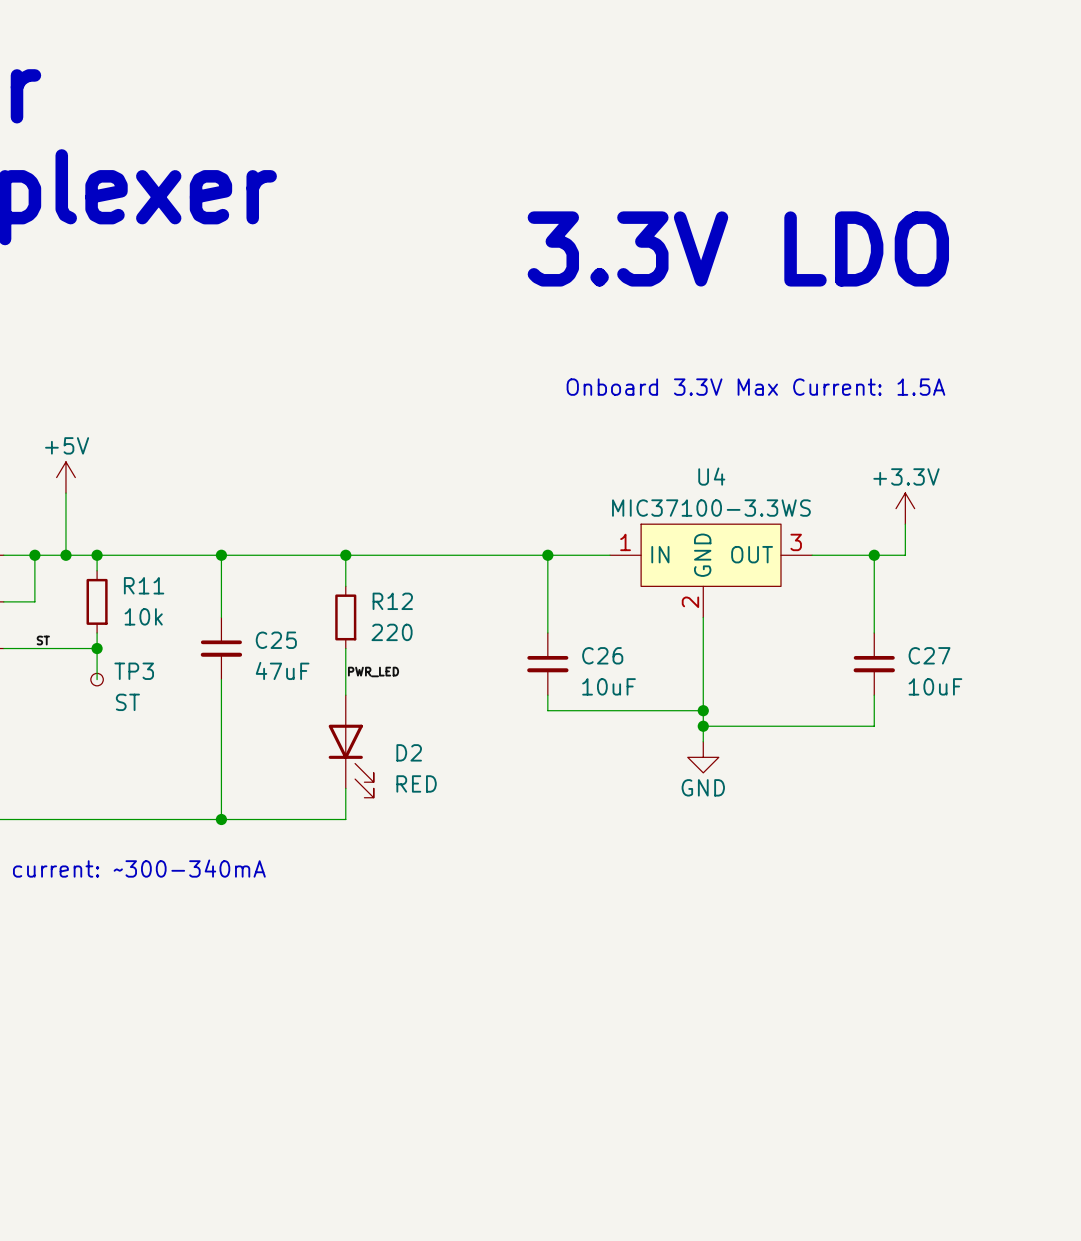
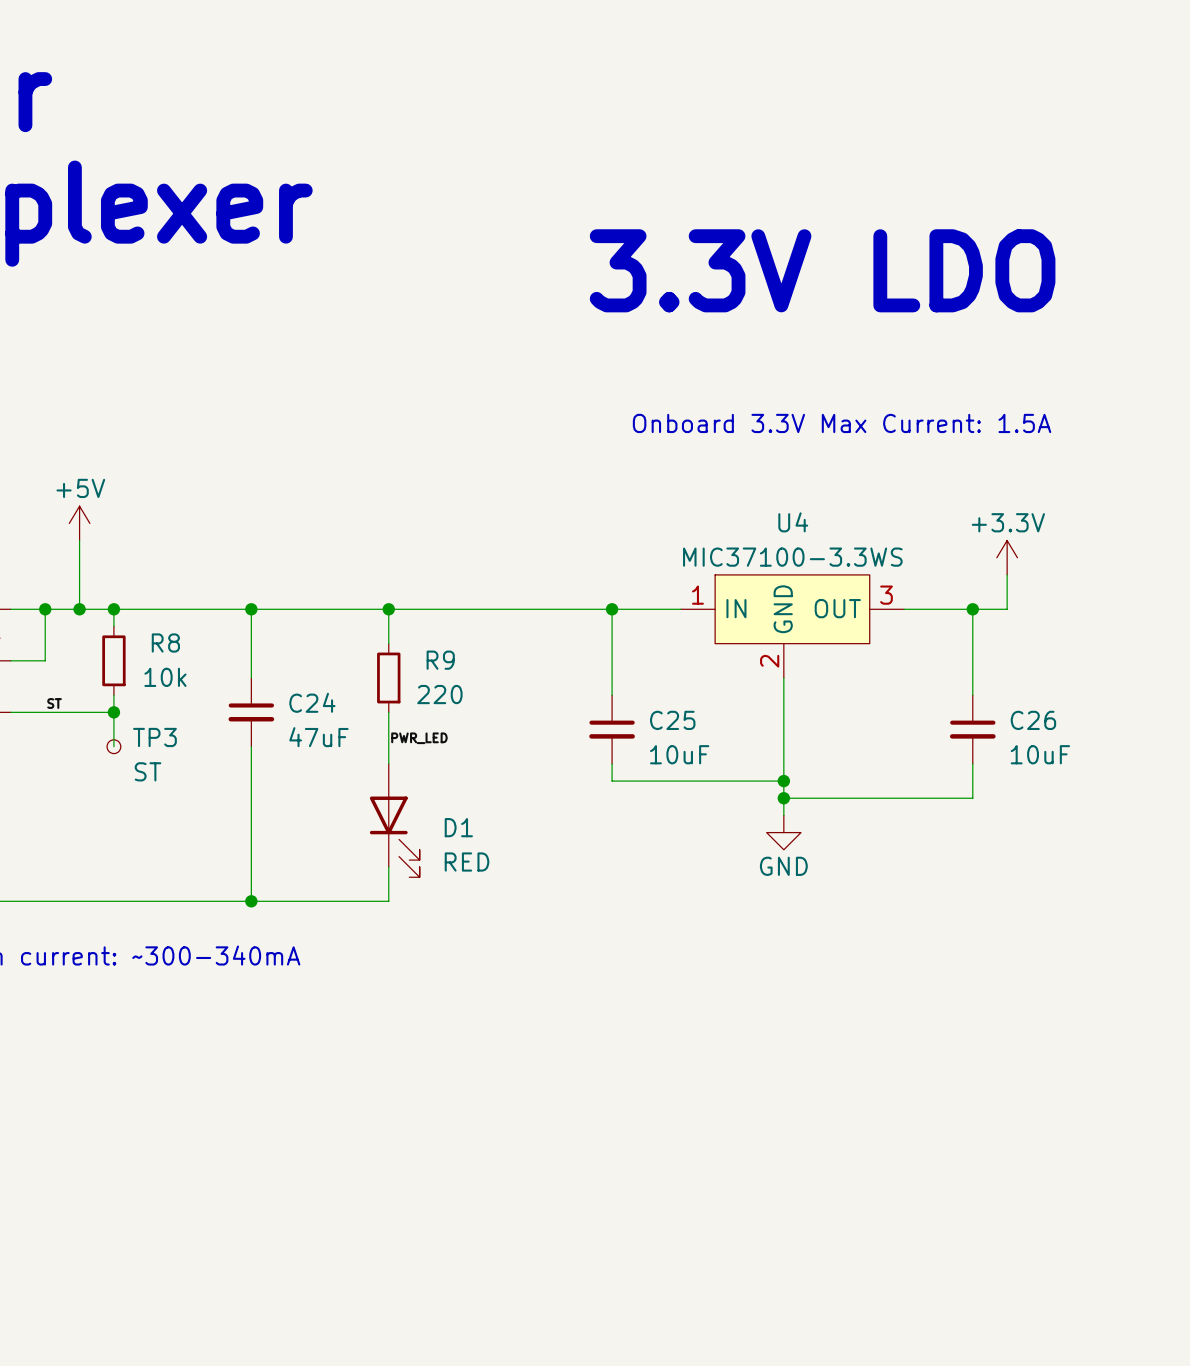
R11 name: R11 (144, 585) -> R8 (165, 643)
R12 name: R12 (392, 601) -> R9 (440, 660)
C25 name: C25 (276, 640) -> C24 (312, 702)
C26 name: C26 (602, 655) -> C25 (672, 720)
C27 name: C27 (929, 655) -> C26 (1033, 720)
D2 name: D2 (409, 752) -> D1 (458, 827)

